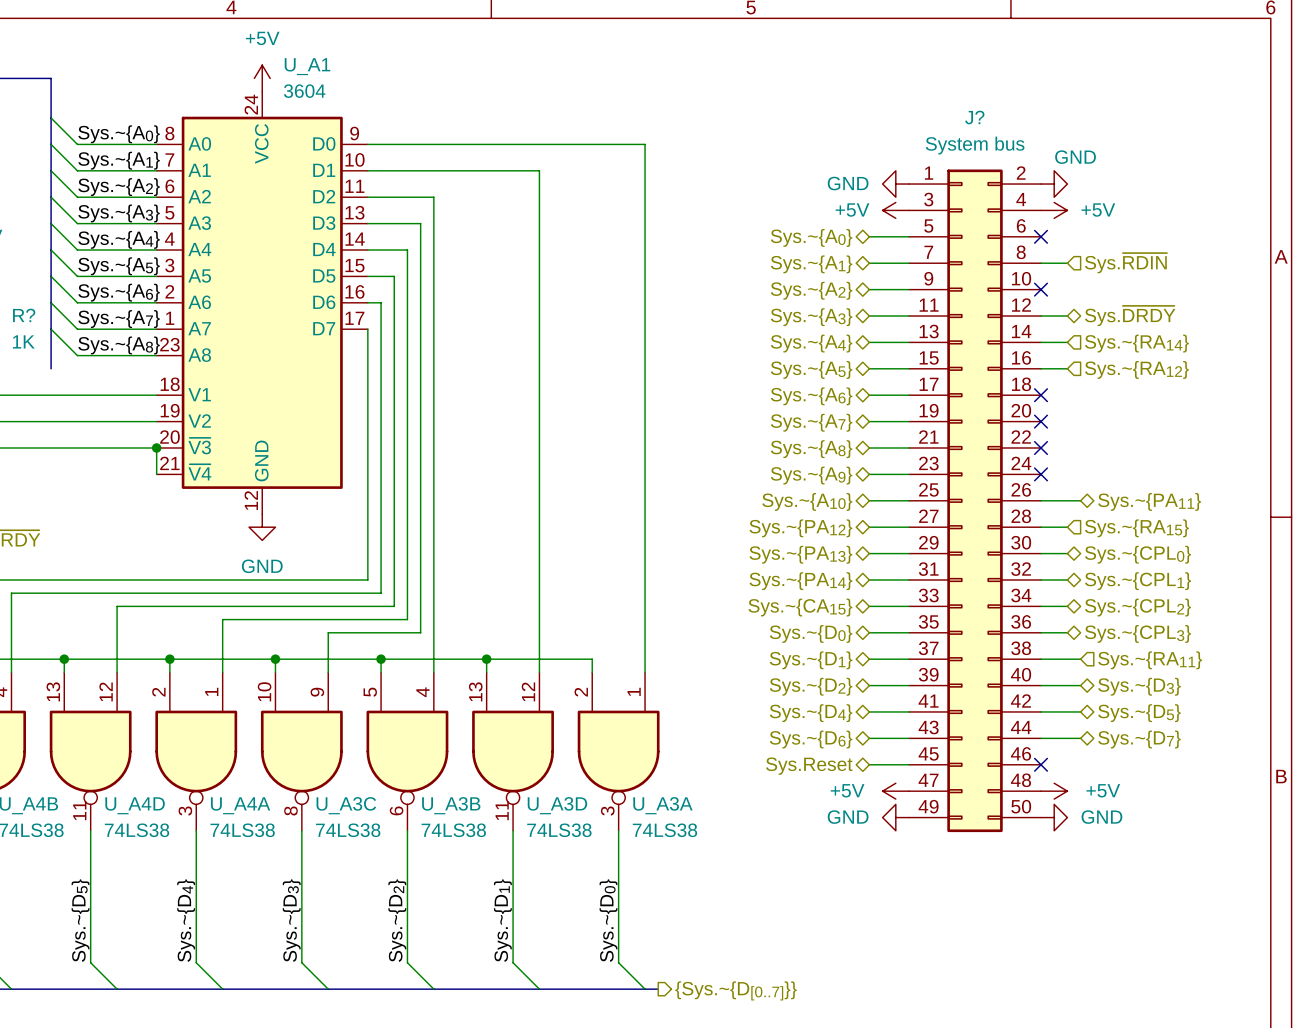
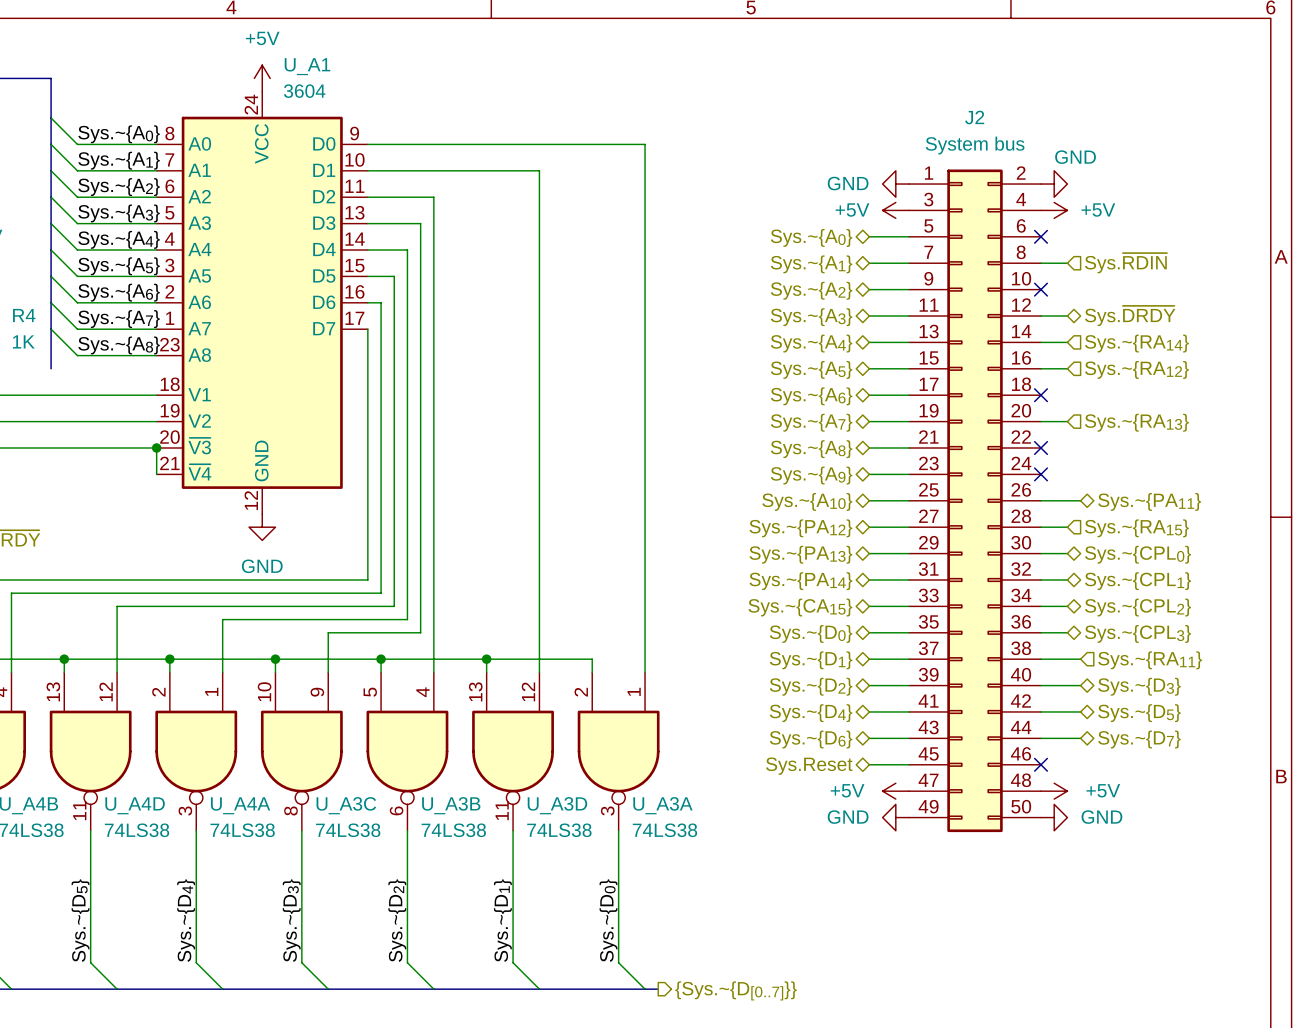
J? name: J? (974, 117) -> J2 (974, 117)
R? name: R? (24, 315) -> R4 (24, 315)
wire: none -> (1041, 421) (1067, 421)
no-connect mark: (1041, 421) -> none
hierarchical label: none -> Sys.~{RA13} (1136, 422)

